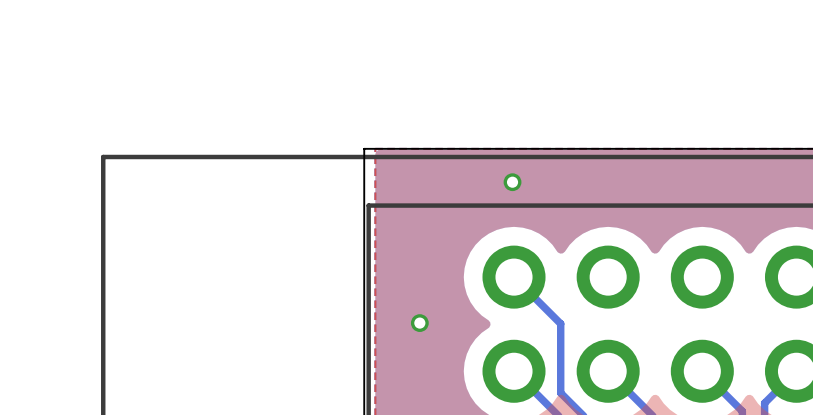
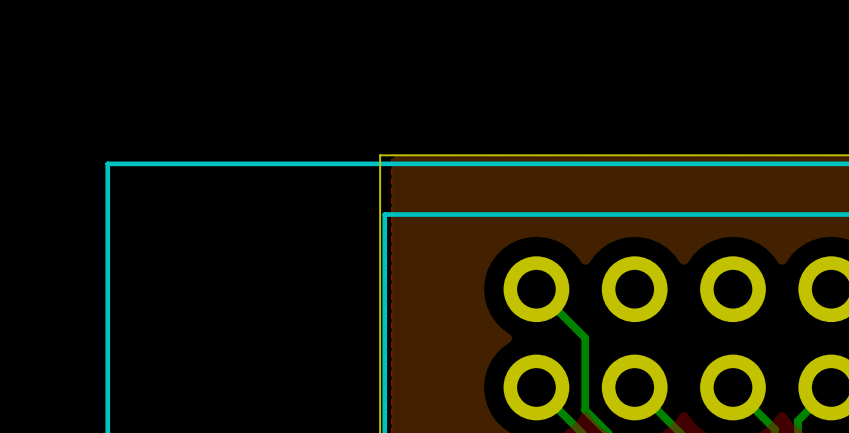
via: (512, 182) -> none
via: (419, 323) -> none

